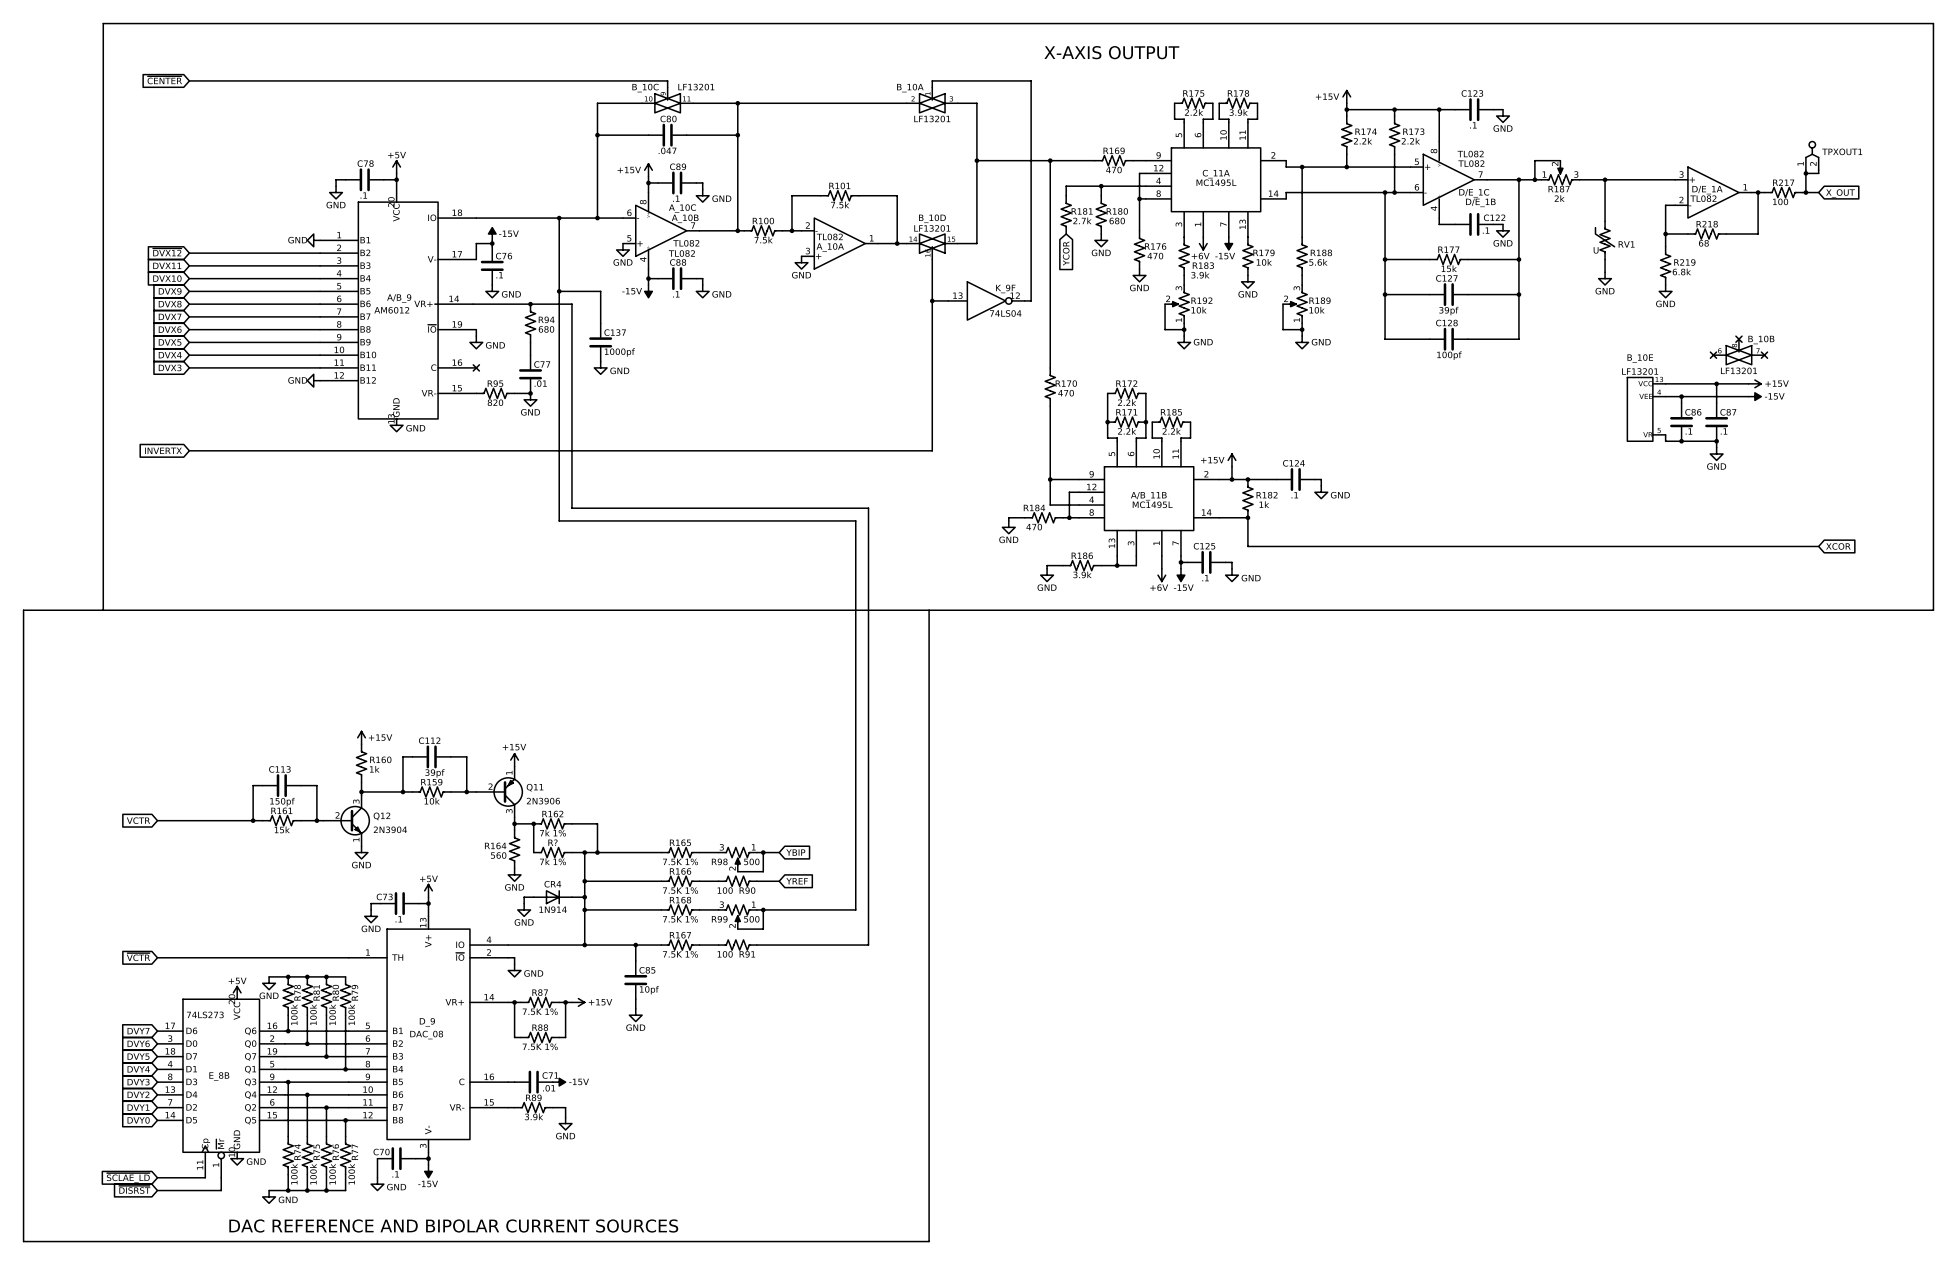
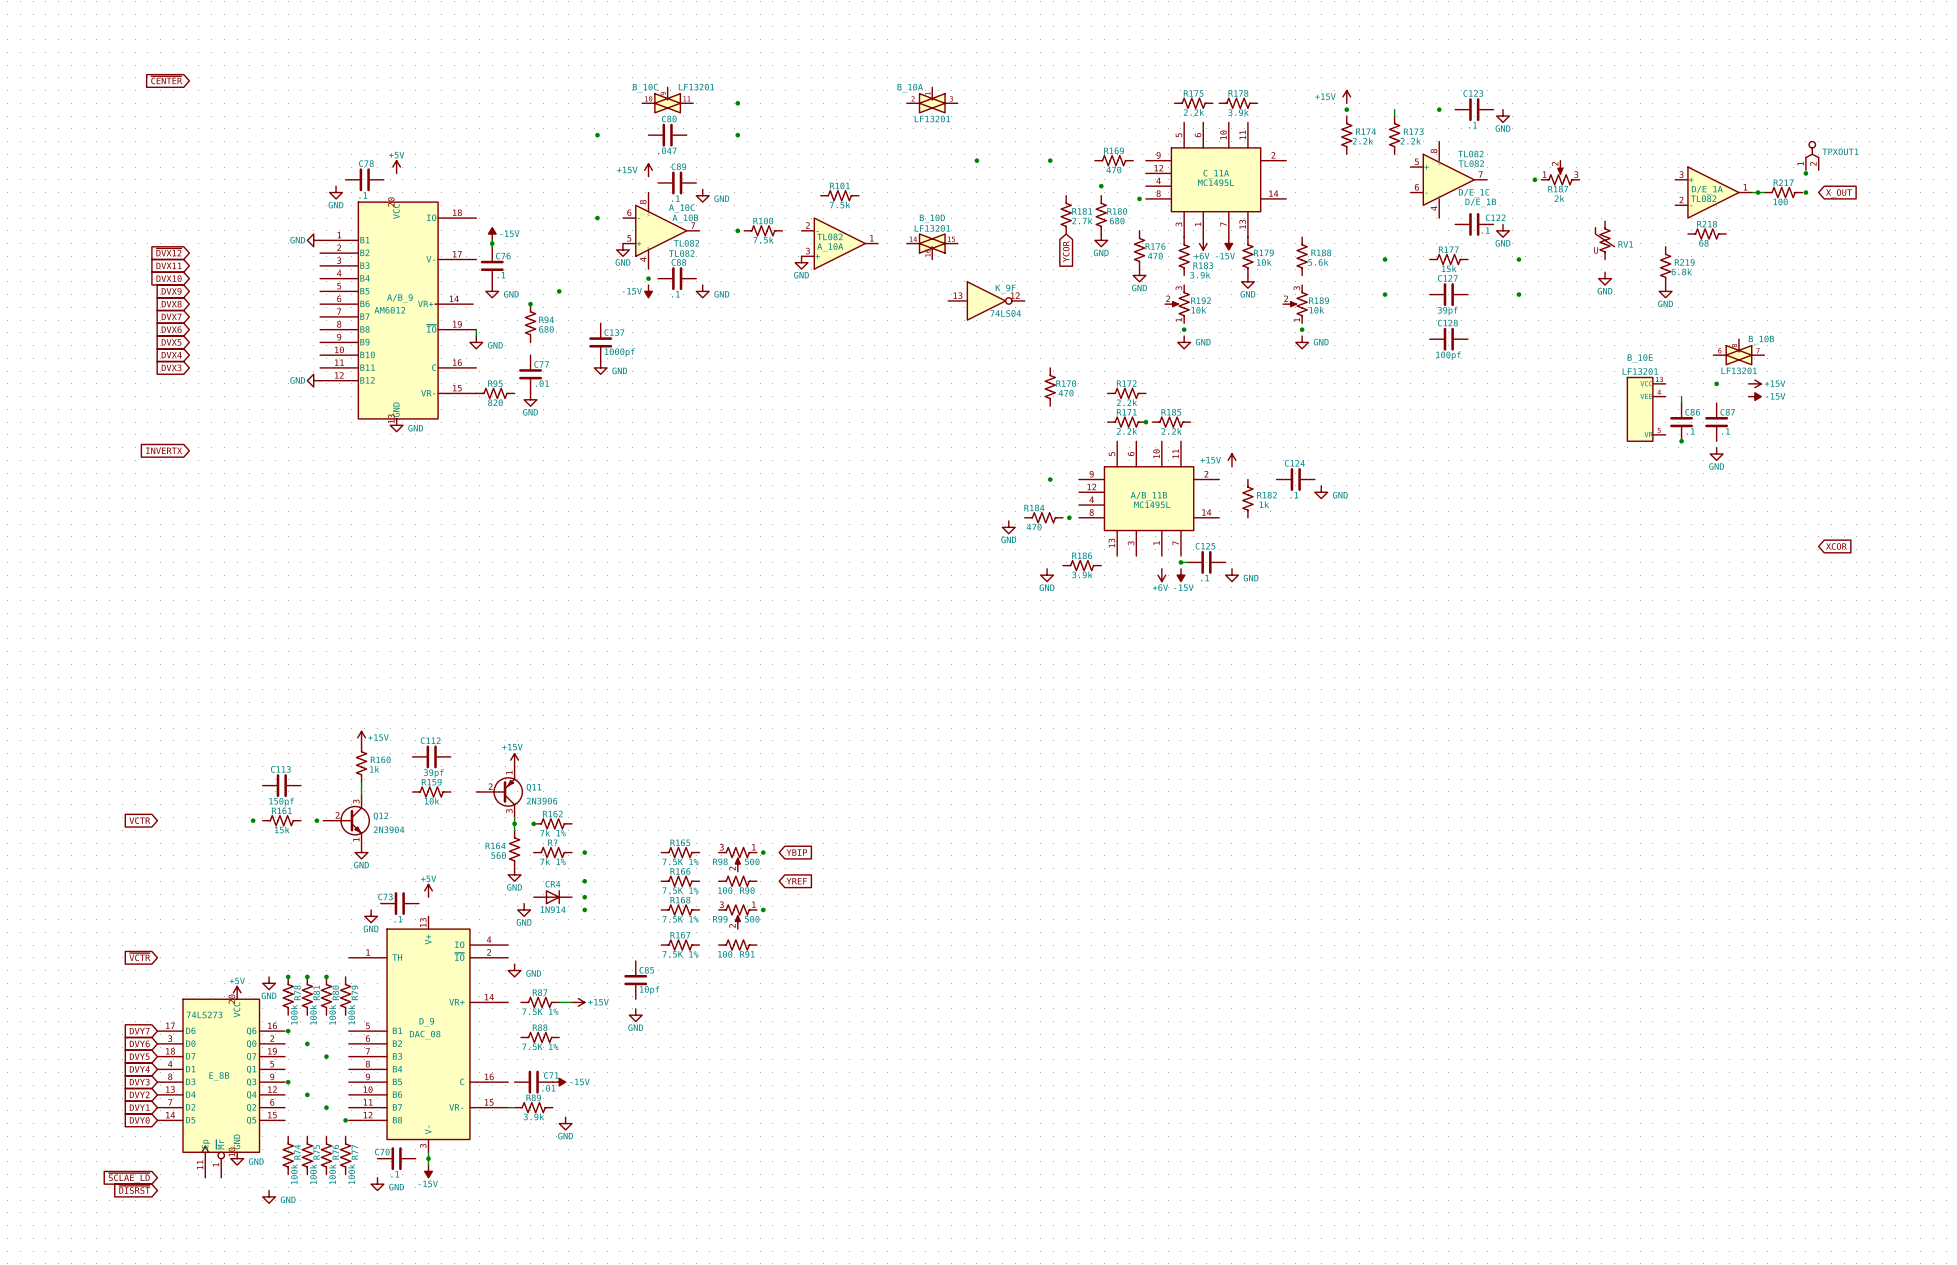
text: X-AXIS OUTPUT (1111, 52) -> none
wire: (189, 80) (667, 80) (667, 87) -> none
wire: (932, 87) (932, 80) (1031, 80) (1031, 300) (1024, 300) -> none
wire: (642, 103) (597, 103) (597, 218) -> none
wire: (693, 103) (906, 103) -> none
wire: (737, 103) (737, 230) -> none
wire: (957, 103) (976, 103) (976, 243) (957, 243) -> none
wire: (1174, 103) (1174, 119) (1184, 119) (1184, 122) -> none
wire: (1212, 103) (1212, 119) (1203, 119) (1203, 122) -> none
wire: (1219, 103) (1219, 119) (1228, 119) (1228, 122) -> none
wire: (1257, 103) (1257, 119) (1247, 119) (1247, 122) -> none
wire: (1346, 103) (1346, 116) -> none
wire: (1346, 109) (1455, 109) -> none
junction: (1394, 109) -> none
wire: (1439, 109) (1439, 141) -> none
wire: (1493, 109) (1503, 109) -> none
wire: (597, 135) (648, 135) -> none
wire: (686, 135) (737, 135) -> none
wire: (1346, 154) (1346, 167) -> none
wire: (1394, 154) (1394, 192) -> none
wire: (976, 160) (1094, 160) -> none
wire: (1050, 160) (1050, 367) -> none
wire: (1133, 160) (1145, 160) -> none
wire: (1286, 160) (1286, 167) (1410, 167) -> none
wire: (1560, 160) (1534, 160) (1534, 179) -> none
wire: (1302, 167) (1302, 237) -> none
junction: (1302, 167) -> none
junction: (1346, 167) -> none
wire: (1805, 170) (1805, 192) -> none
wire: (1818, 170) (1818, 173) (1805, 173) -> none
wire: (396, 173) (396, 202) -> none
wire: (1145, 173) (1139, 173) (1139, 230) -> none
wire: (648, 176) (648, 192) -> none
wire: (345, 179) (336, 179) (336, 186) -> none
wire: (383, 179) (396, 179) -> none
junction: (396, 179) -> none
wire: (1487, 179) (1541, 179) -> none
wire: (1518, 179) (1518, 339) (1467, 339) -> none
junction: (1518, 179) -> none
wire: (1579, 179) (1675, 179) -> none
wire: (1605, 179) (1605, 221) -> none
junction: (1605, 179) -> none
wire: (648, 182) (658, 182) -> none
junction: (648, 182) -> none
wire: (696, 182) (702, 182) (702, 189) -> none
wire: (1101, 186) (1101, 195) -> none
wire: (1145, 186) (1066, 186) (1066, 195) -> none
wire: (1385, 192) (1385, 339) (1429, 339) -> none
junction: (1385, 192) -> none
junction: (1394, 192) -> none
wire: (1410, 192) (1286, 192) (1286, 198) -> none
wire: (1758, 192) (1758, 234) (1726, 234) -> none
wire: (1802, 192) (1818, 192) -> none
wire: (820, 195) (791, 195) (791, 230) -> none
wire: (858, 195) (897, 195) (897, 243) -> none
wire: (1139, 198) (1145, 198) -> none
wire: (1675, 205) (1665, 205) (1665, 246) -> none
wire: (476, 218) (622, 218) -> none
wire: (559, 218) (559, 520) (855, 520) (855, 909) (756, 909) -> none
junction: (559, 218) -> none
wire: (1439, 218) (1439, 224) (1455, 224) -> none
wire: (1493, 224) (1503, 224) -> none
wire: (699, 230) (744, 230) -> none
wire: (782, 230) (801, 230) -> none
junction: (791, 230) -> none
wire: (1665, 234) (1687, 234) -> none
junction: (1665, 234) -> none
wire: (492, 243) (476, 243) (476, 259) -> none
wire: (878, 243) (906, 243) -> none
junction: (897, 243) -> none
wire: (189, 253) (320, 253) -> none
wire: (932, 259) (932, 450) (189, 450) -> none
wire: (1385, 259) (1429, 259) -> none
wire: (1467, 259) (1518, 259) -> none
wire: (1605, 259) (1605, 272) -> none
wire: (189, 265) (320, 265) -> none
wire: (648, 269) (648, 285) -> none
wire: (1184, 275) (1184, 285) -> none
wire: (1302, 275) (1302, 285) -> none
wire: (189, 278) (320, 278) -> none
wire: (648, 278) (658, 278) -> none
wire: (696, 278) (702, 278) (702, 285) -> none
wire: (189, 291) (320, 291) -> none
wire: (559, 291) (600, 291) (600, 323) -> none
wire: (1385, 294) (1429, 294) -> none
wire: (1467, 294) (1518, 294) -> none
wire: (932, 300) (948, 300) -> none
junction: (932, 300) -> none
wire: (189, 304) (320, 304) -> none
wire: (473, 304) (571, 304) (571, 508) (868, 508) (868, 945) (756, 945) -> none
wire: (1165, 304) (1165, 329) (1184, 329) -> none
wire: (1283, 304) (1283, 329) (1302, 329) -> none
wire: (189, 316) (320, 316) -> none
wire: (1184, 323) (1184, 336) -> none
wire: (1302, 323) (1302, 336) -> none
wire: (189, 329) (320, 329) -> none
no-connect mark: (1738, 339) -> none
wire: (189, 342) (320, 342) -> none
wire: (530, 342) (530, 355) -> none
wire: (189, 355) (320, 355) -> none
no-connect mark: (1713, 355) -> none
no-connect mark: (1764, 355) -> none
wire: (189, 367) (320, 367) -> none
no-connect mark: (476, 367) -> none
wire: (1665, 383) (1748, 383) -> none
wire: (1716, 383) (1716, 402) -> none
wire: (514, 393) (530, 393) -> none
junction: (530, 393) -> none
wire: (1107, 393) (1107, 438) (1117, 438) (1117, 441) -> none
wire: (1145, 393) (1145, 438) (1136, 438) (1136, 441) -> none
wire: (1665, 396) (1748, 396) -> none
junction: (1681, 396) -> none
wire: (1050, 406) (1050, 505) (1078, 505) -> none
junction: (1107, 422) -> none
wire: (1152, 422) (1152, 438) (1161, 438) (1161, 441) -> none
wire: (1190, 422) (1190, 438) (1180, 438) (1180, 441) -> none
wire: (1665, 434) (1665, 441) (1716, 441) (1716, 447) -> none
junction: (1716, 441) -> none
wire: (1231, 466) (1231, 479) -> none
wire: (1050, 479) (1078, 479) -> none
wire: (1219, 479) (1276, 479) -> none
junction: (1231, 479) -> none
junction: (1247, 479) -> none
wire: (1314, 479) (1321, 479) (1321, 485) -> none
wire: (1078, 492) (1069, 492) (1069, 517) -> none
wire: (1024, 517) (1008, 517) (1008, 520) -> none
wire: (1063, 517) (1078, 517) -> none
wire: (1219, 517) (1247, 517) (1247, 546) (1818, 546) -> none
junction: (1247, 517) -> none
wire: (1117, 556) (1117, 565) -> none
wire: (1136, 556) (1136, 565) (1101, 565) -> none
wire: (1161, 556) (1161, 568) -> none
wire: (1180, 556) (1180, 568) -> none
wire: (1225, 562) (1231, 562) (1231, 568) -> none
wire: (1063, 565) (1047, 565) (1047, 568) -> none
junction: (1117, 565) -> none
line: (103, 610) (103, 23) (1933, 23) (1933, 610) (23, 610) (23, 1241) (929, 1241) (929, 610) -> none
wire: (412, 756) (402, 756) (402, 791) -> none
wire: (450, 756) (466, 756) (466, 791) -> none
wire: (262, 785) (253, 785) (253, 820) -> none
wire: (300, 785) (316, 785) (316, 820) -> none
wire: (361, 791) (412, 791) -> none
junction: (361, 791) -> none
junction: (402, 791) -> none
wire: (450, 791) (476, 791) -> none
junction: (466, 791) -> none
wire: (157, 820) (262, 820) -> none
wire: (300, 820) (323, 820) -> none
wire: (514, 823) (533, 823) (533, 852) -> none
wire: (571, 823) (597, 823) (597, 852) -> none
wire: (571, 852) (661, 852) -> none
wire: (584, 852) (584, 945) -> none
junction: (597, 852) -> none
wire: (699, 852) (718, 852) -> none
wire: (756, 852) (779, 852) -> none
wire: (763, 852) (763, 871) (737, 871) -> none
wire: (584, 881) (661, 881) -> none
wire: (699, 881) (718, 881) -> none
wire: (756, 881) (779, 881) -> none
wire: (428, 897) (428, 916) -> none
wire: (533, 897) (524, 897) (524, 903) -> none
wire: (571, 897) (584, 897) -> none
wire: (380, 903) (371, 903) (371, 909) -> none
wire: (418, 903) (428, 903) -> none
junction: (428, 903) -> none
wire: (584, 909) (661, 909) -> none
wire: (699, 909) (718, 909) -> none
wire: (763, 909) (763, 929) (737, 929) -> none
wire: (508, 945) (661, 945) -> none
junction: (584, 945) -> none
wire: (635, 945) (635, 960) -> none
junction: (635, 945) -> none
wire: (699, 945) (718, 945) -> none
wire: (157, 957) (348, 957) -> none
wire: (508, 957) (514, 957) (514, 964) -> none
wire: (269, 976) (345, 976) -> none
wire: (635, 999) (635, 1008) -> none
wire: (508, 1002) (520, 1002) -> none
wire: (514, 1002) (514, 1037) (520, 1037) -> none
junction: (514, 1002) -> none
wire: (565, 1002) (565, 1037) (559, 1037) -> none
junction: (565, 1002) -> none
wire: (288, 1015) (288, 1031) -> none
wire: (307, 1015) (307, 1043) -> none
wire: (326, 1015) (326, 1056) -> none
wire: (345, 1015) (345, 1069) -> none
wire: (285, 1031) (348, 1031) -> none
wire: (285, 1043) (348, 1043) -> none
wire: (285, 1056) (348, 1056) -> none
wire: (285, 1069) (348, 1069) -> none
junction: (345, 1069) -> none
wire: (285, 1082) (348, 1082) -> none
wire: (288, 1082) (288, 1136) -> none
wire: (508, 1082) (514, 1082) -> none
wire: (285, 1094) (348, 1094) -> none
wire: (307, 1094) (307, 1136) -> none
wire: (285, 1107) (348, 1107) -> none
wire: (326, 1107) (326, 1136) -> none
wire: (552, 1107) (565, 1107) (565, 1117) -> none
wire: (285, 1120) (348, 1120) -> none
wire: (345, 1120) (345, 1136) -> none
wire: (377, 1158) (377, 1177) -> none
wire: (415, 1158) (428, 1158) -> none
wire: (288, 1174) (288, 1190) -> none
wire: (307, 1174) (307, 1190) -> none
wire: (326, 1174) (326, 1190) -> none
wire: (345, 1174) (345, 1190) (269, 1190) -> none
wire: (157, 1177) (205, 1177) -> none
wire: (221, 1177) (221, 1190) (157, 1190) -> none
junction: (288, 1190) -> none
junction: (307, 1190) -> none
junction: (326, 1190) -> none
text: DAC REFERENCE AND BIPOLAR CURRENT SOURCES (453, 1225) -> none

